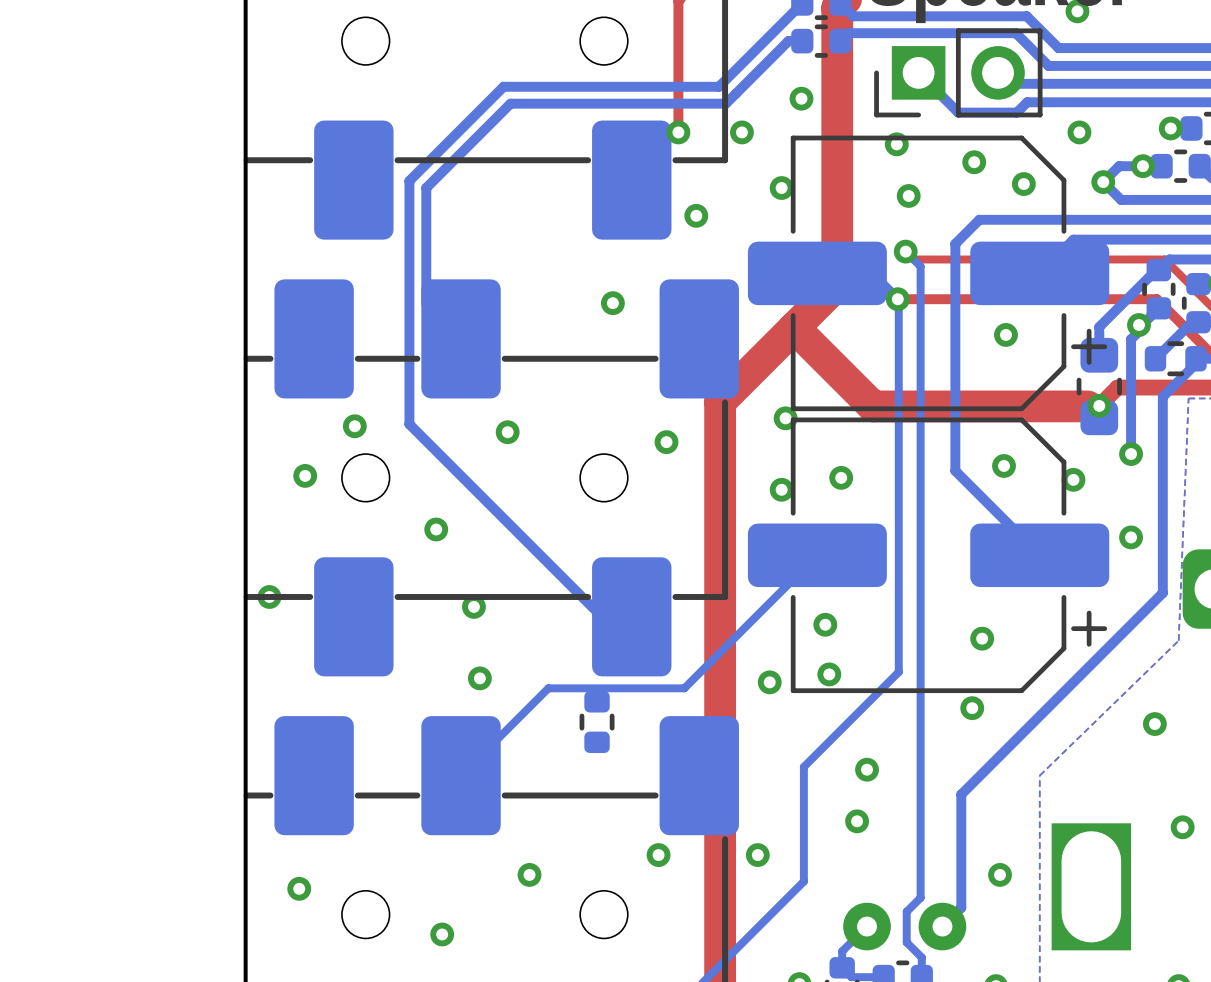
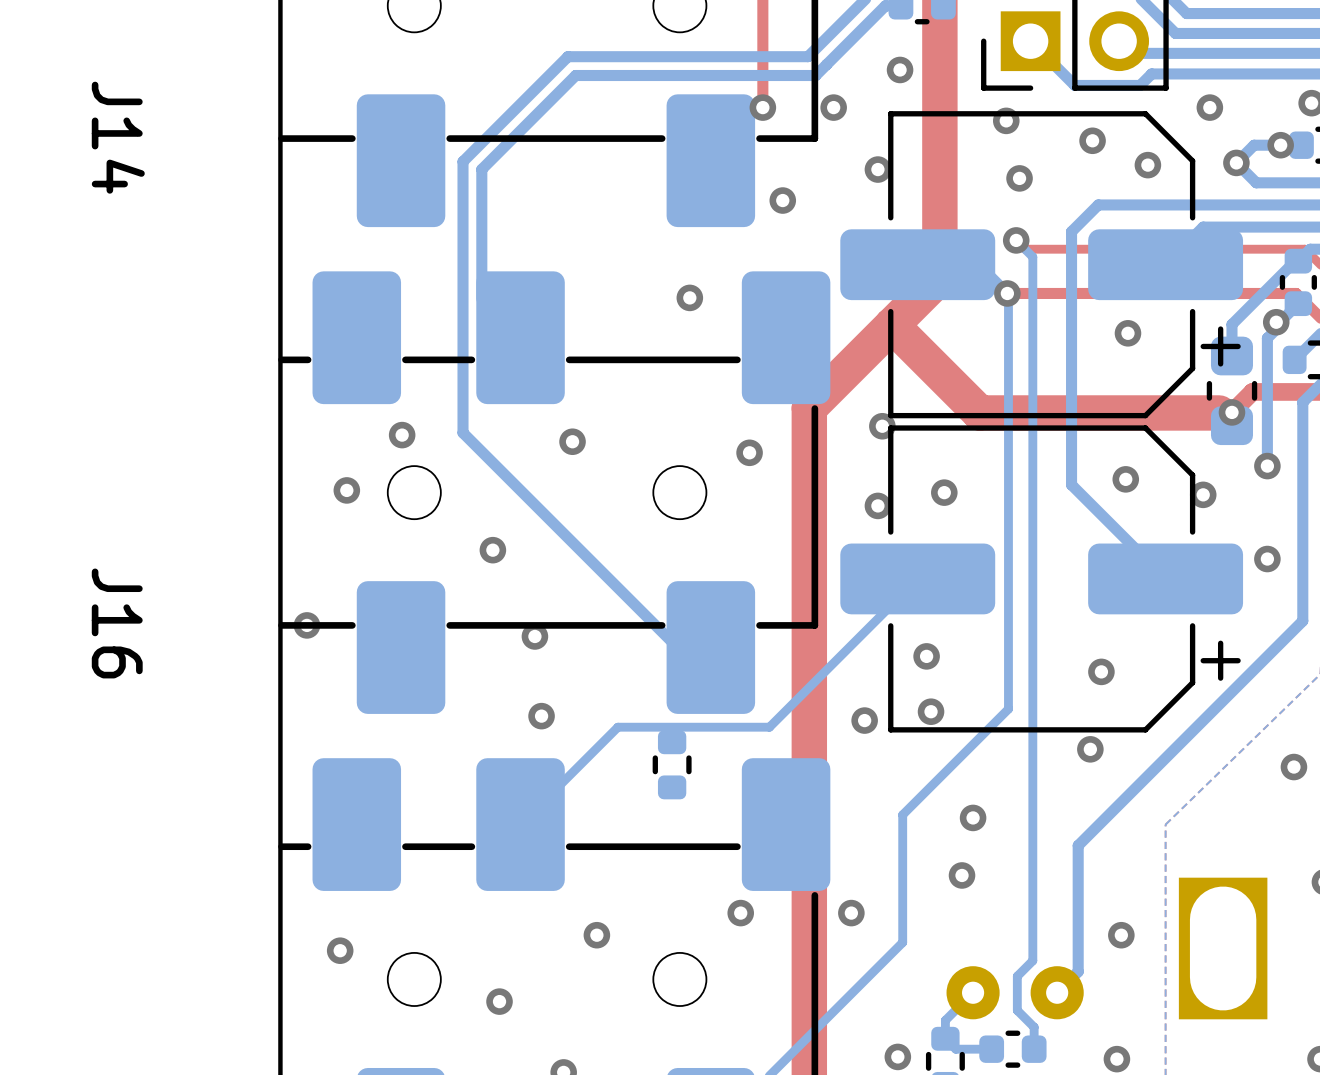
J14 name: none -> J14 (118, 137)
J16 name: none -> J16 (117, 623)

